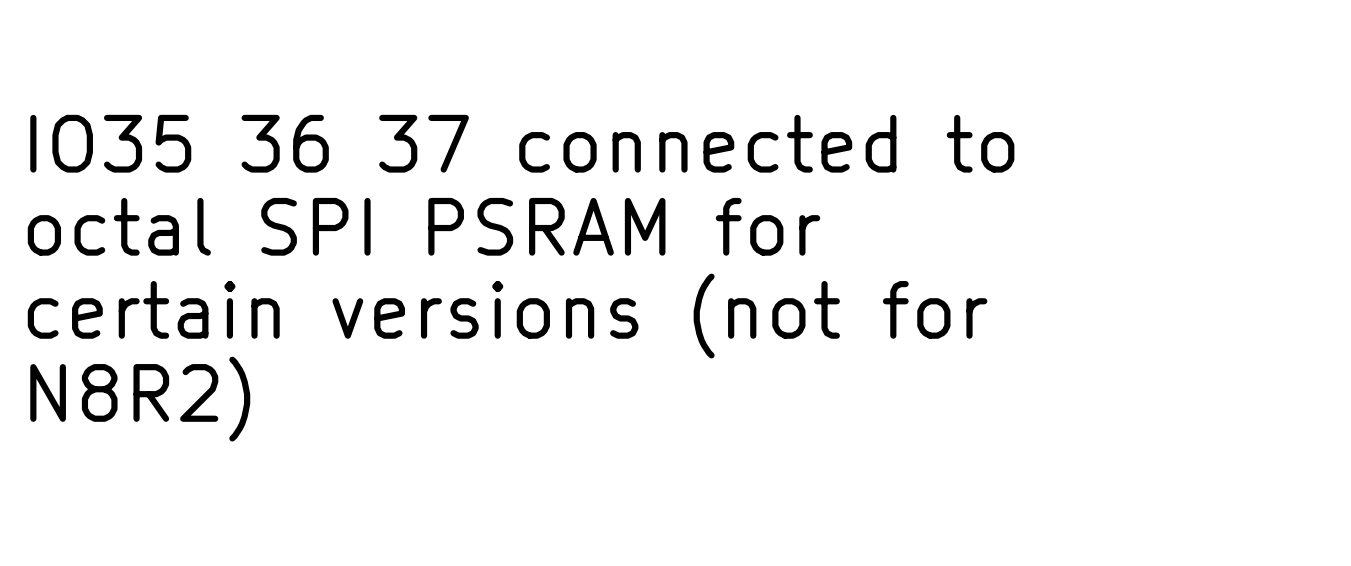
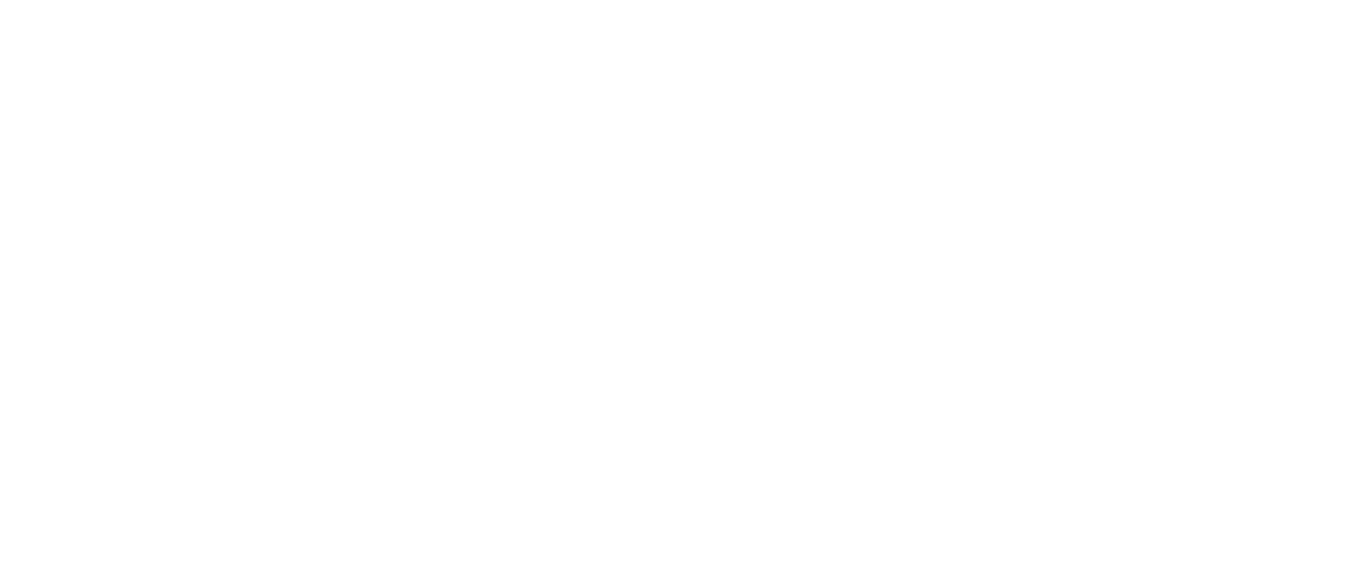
text: IO35 36 37 connected to (522, 143) -> none
text: octal SPI PSRAM for (424, 226) -> none
text: certain versions (not for (507, 316) -> none
text: N8R2) (140, 399) -> none

